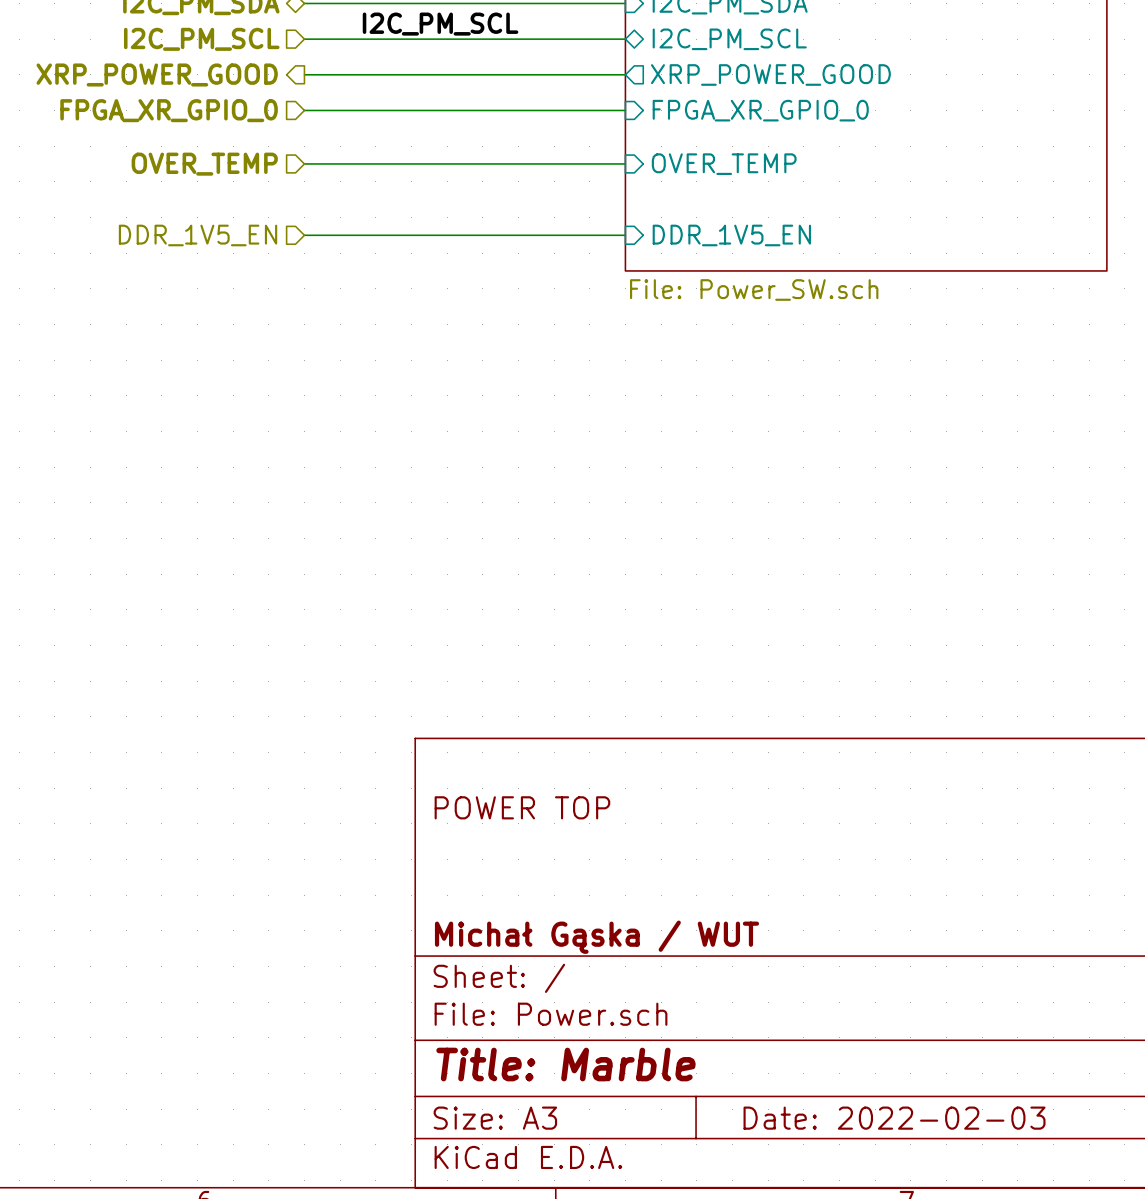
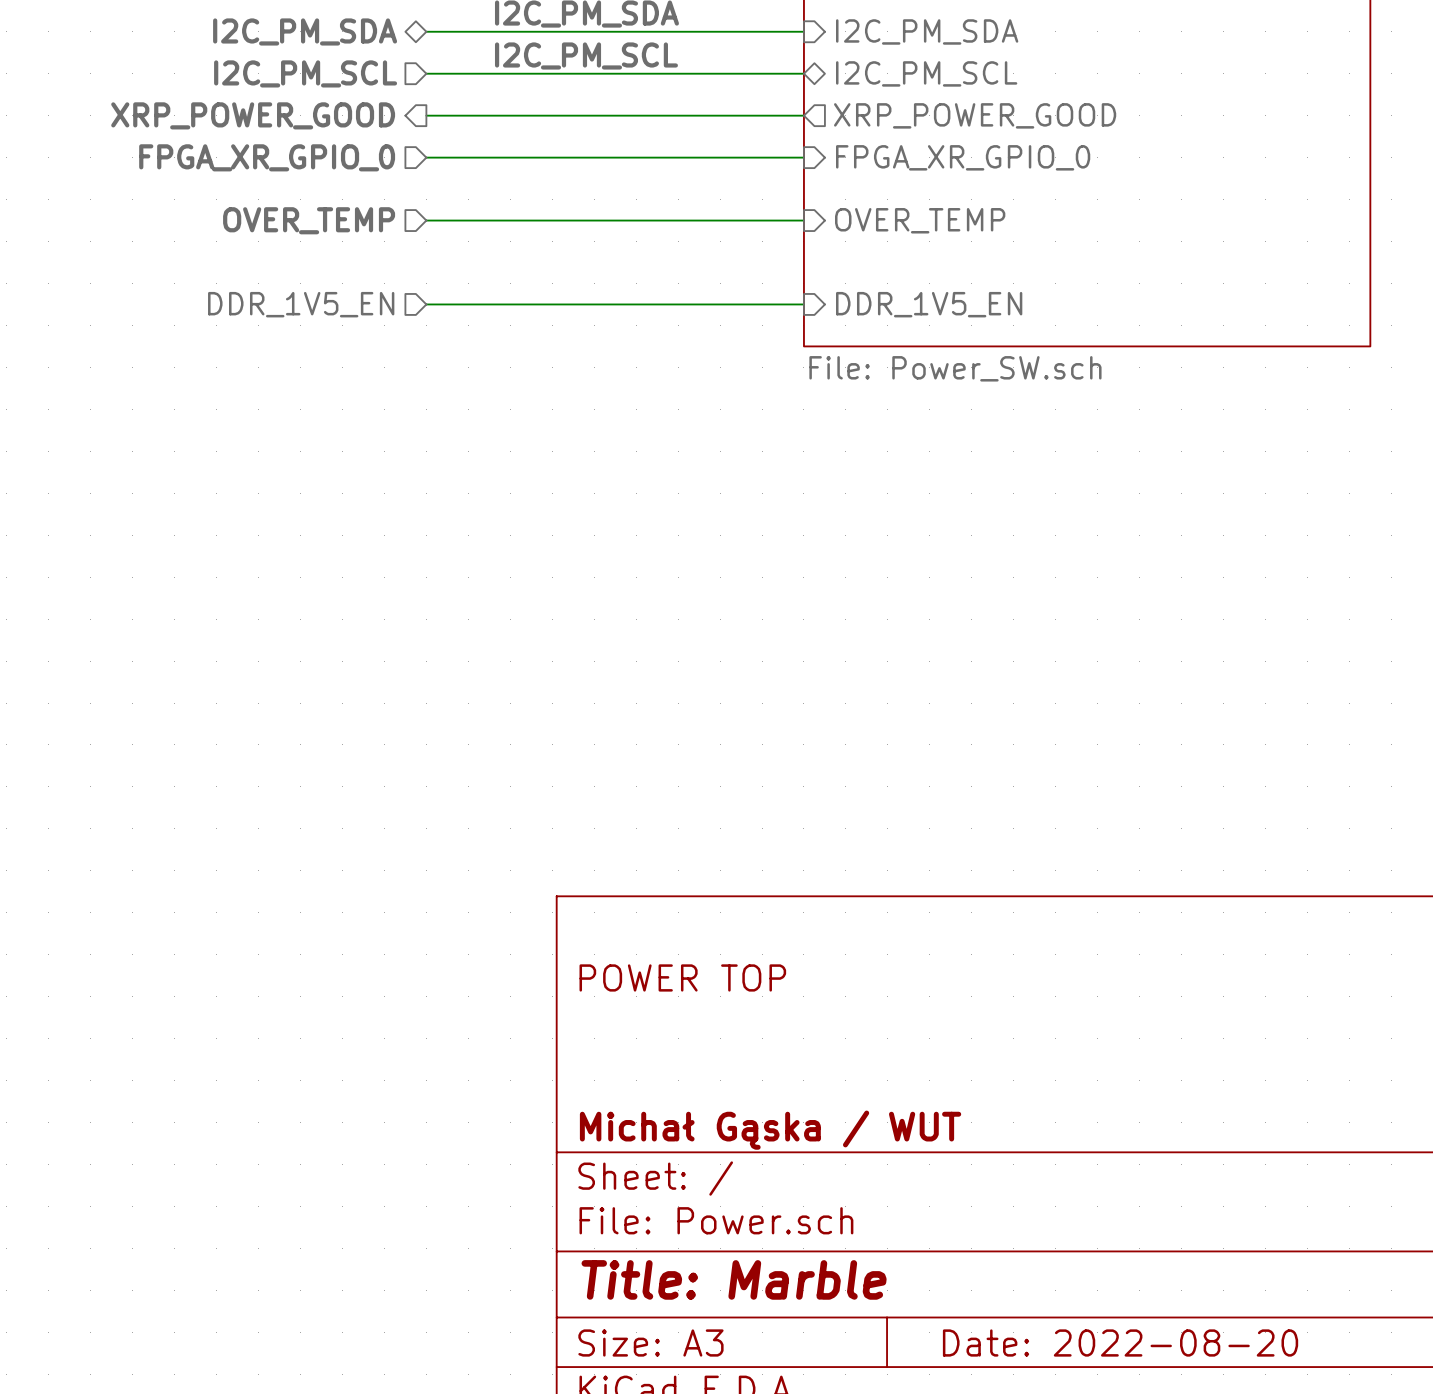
title block: Date: 2022-02-03 (894, 1118) -> Date: 2022-08-20 (1120, 1342)

